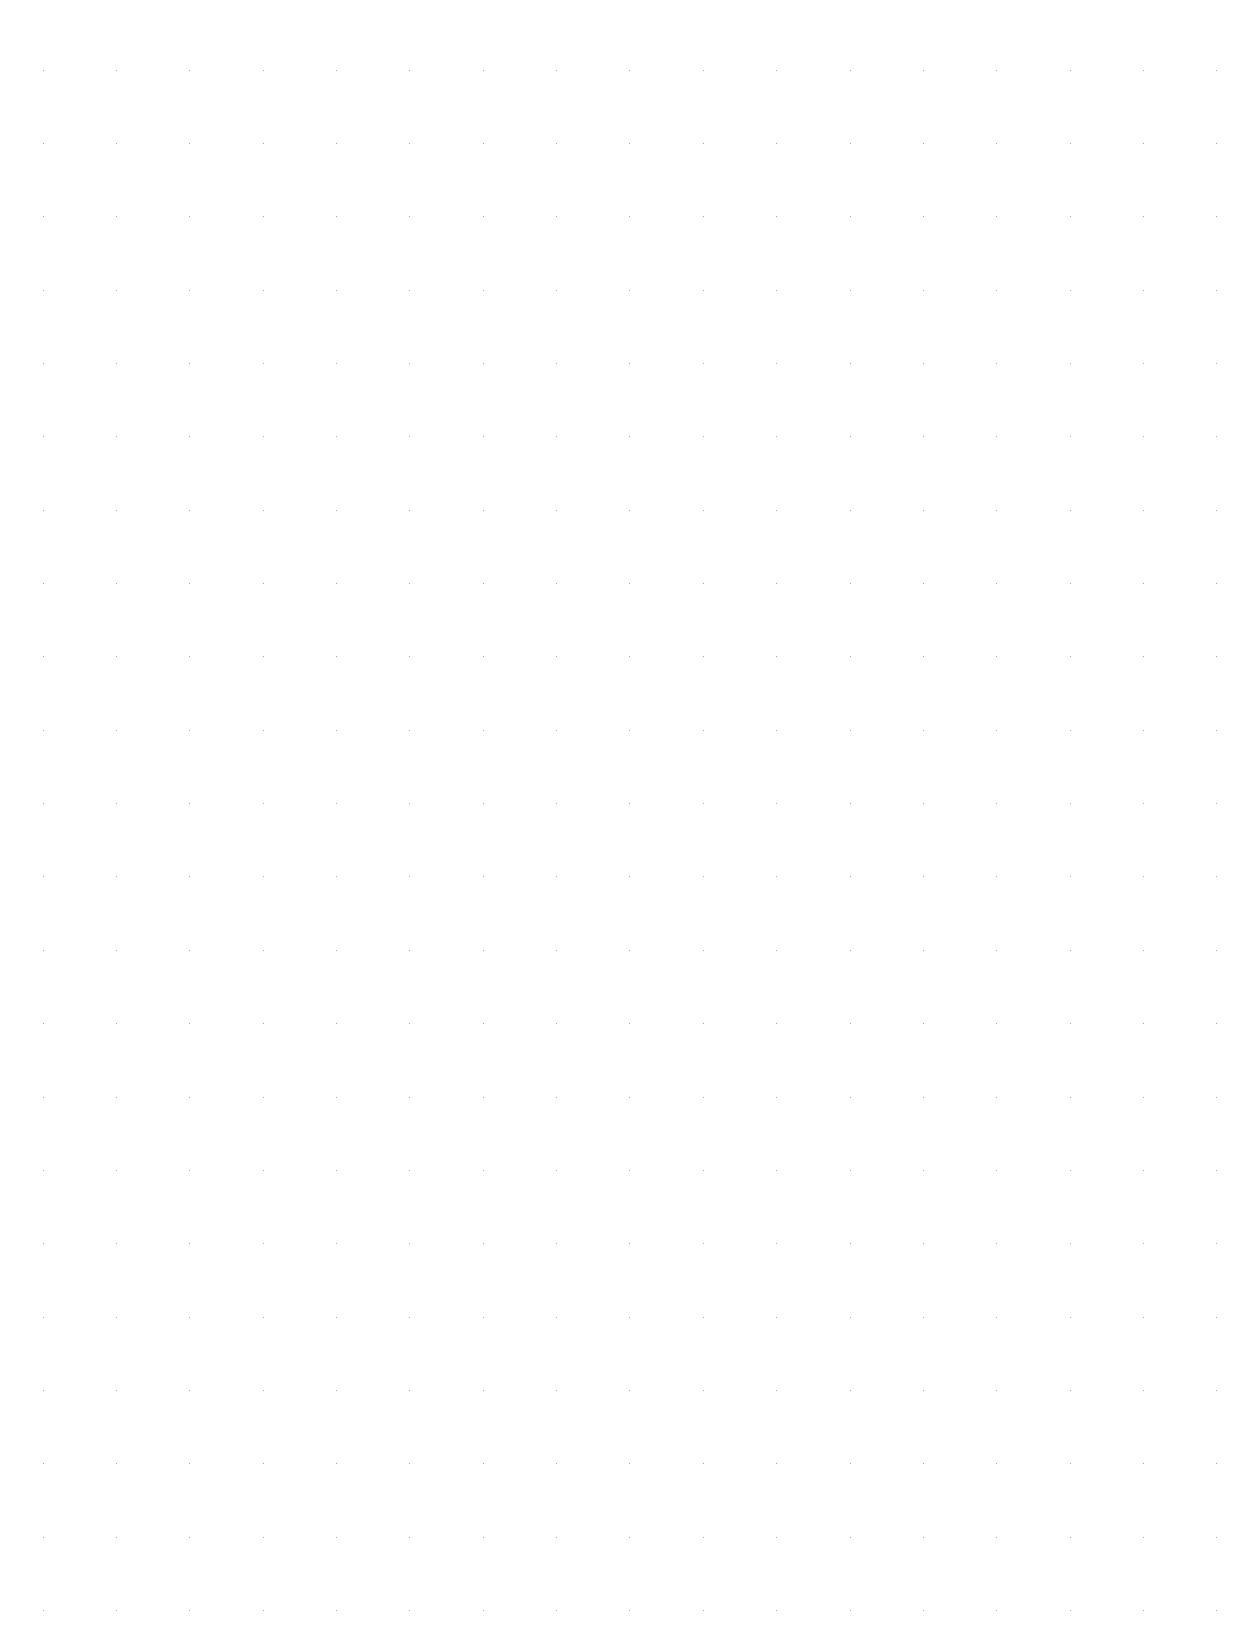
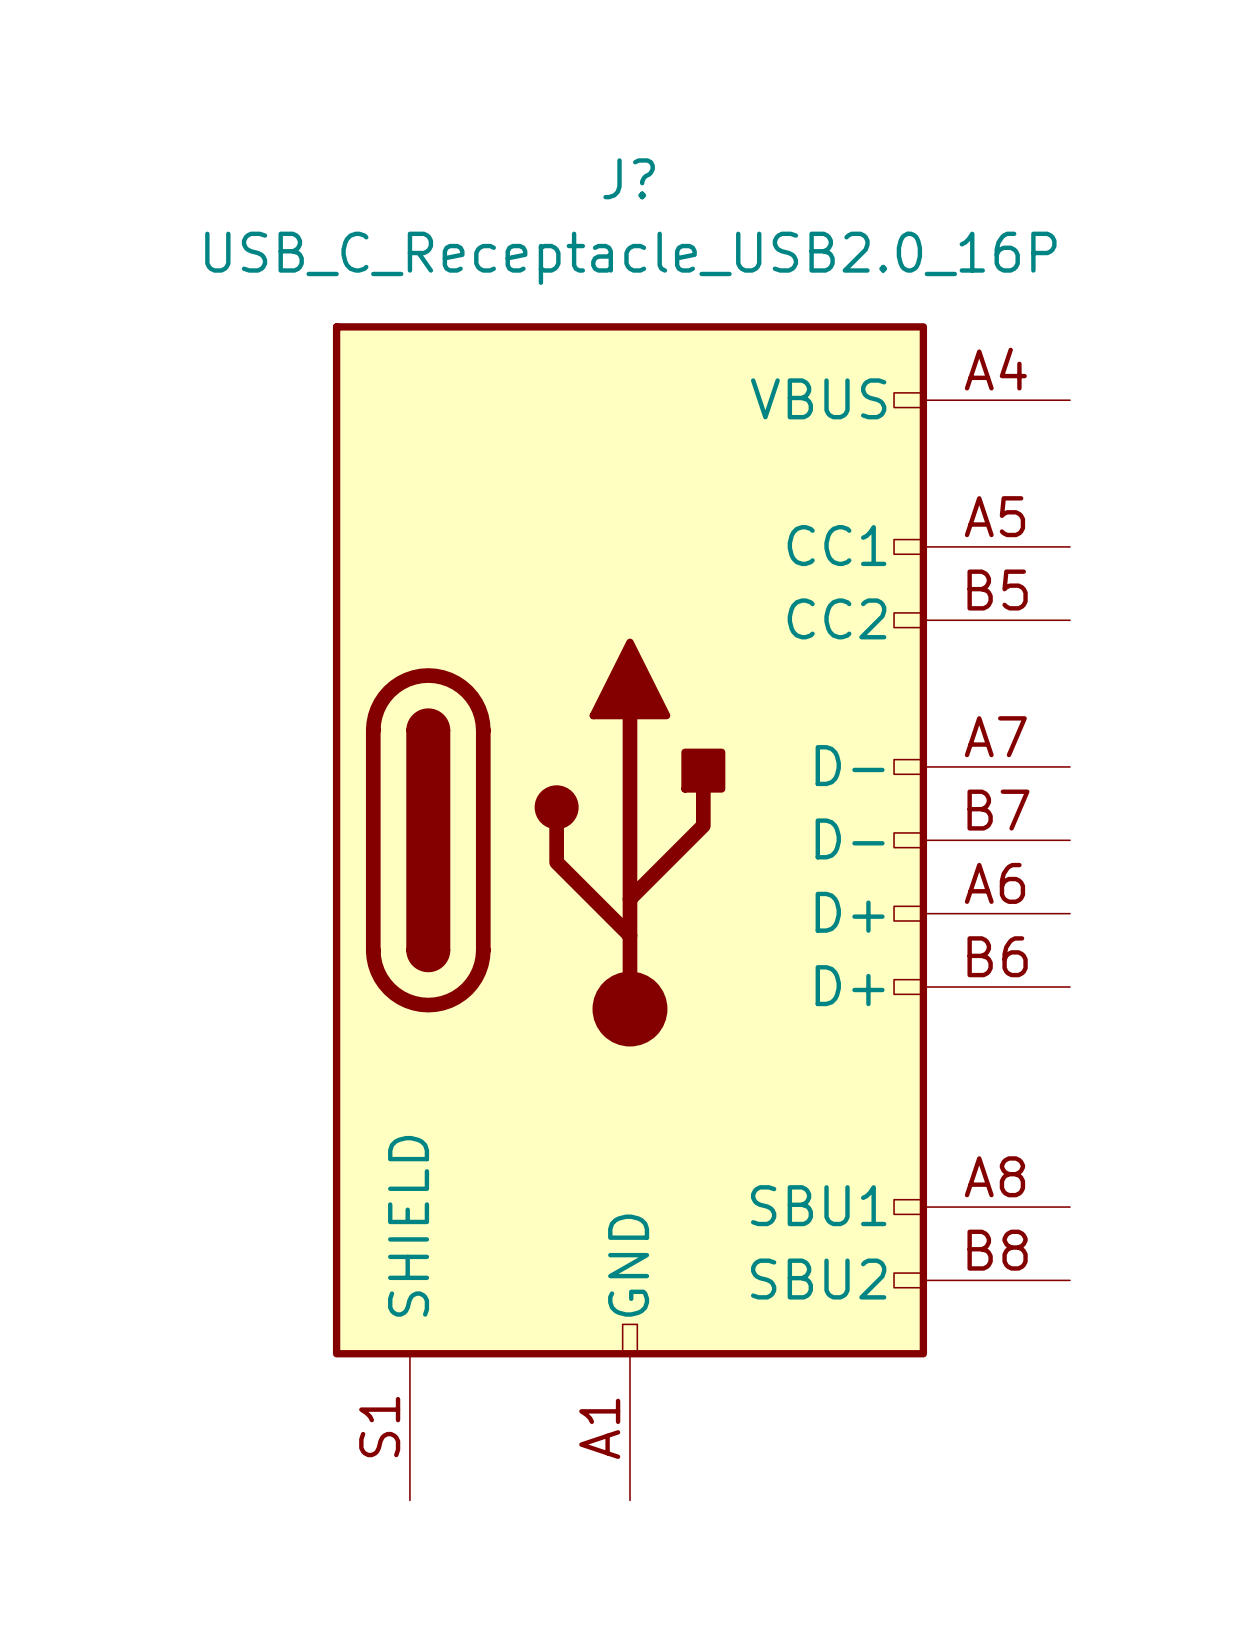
J?: none -> USB_C_Receptacle_USB2.0_16P (701, 911)

